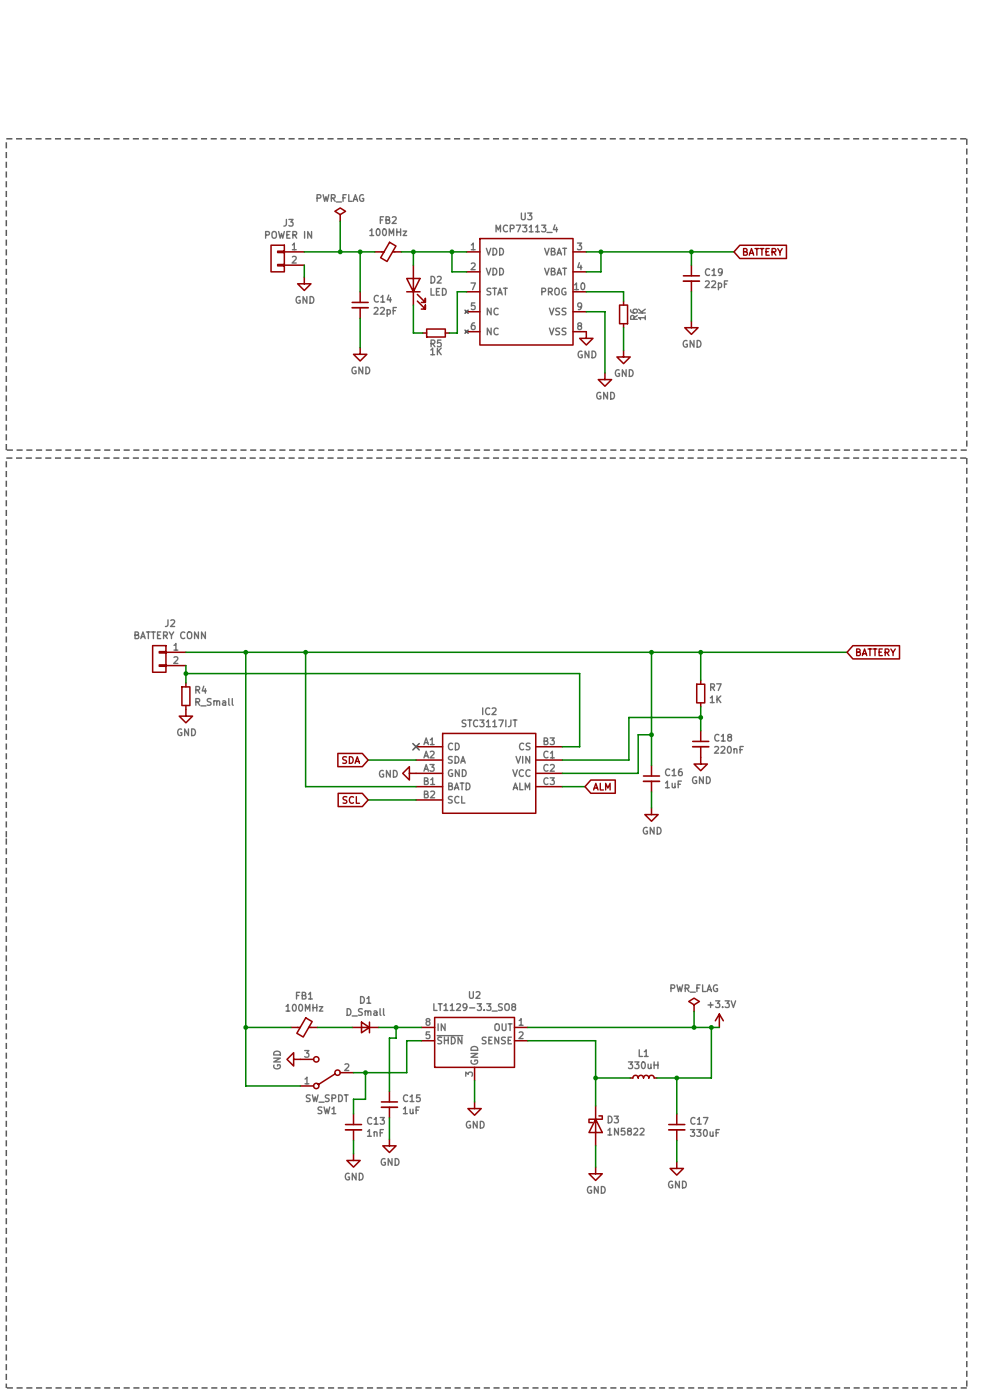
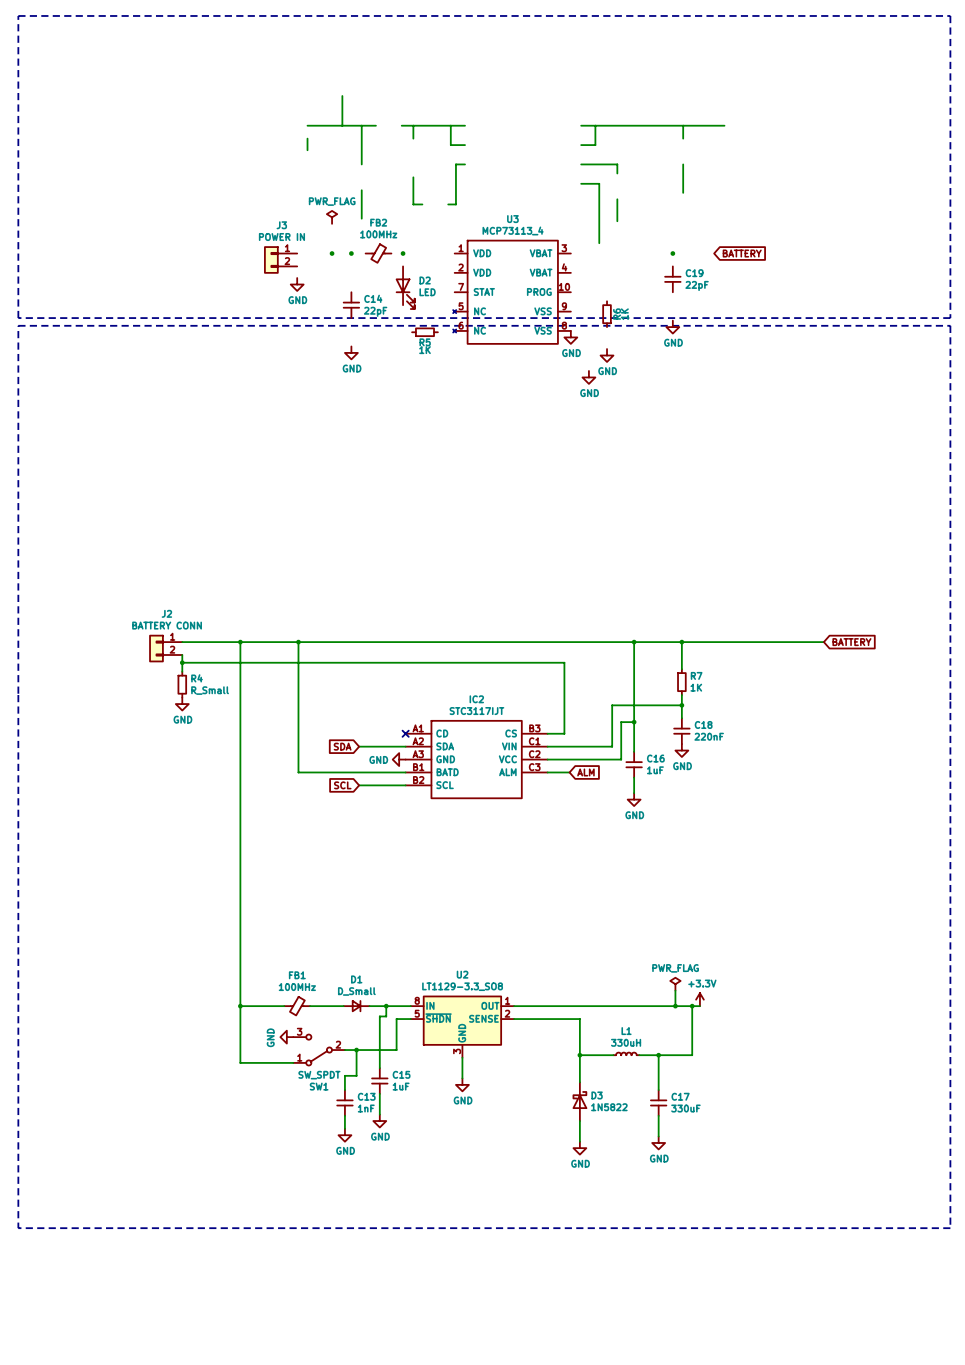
line: none -> (18, 15) (18, 318) (950, 318) (950, 15) (18, 15)
wire: none -> (342, 96) (342, 125)
wire: none -> (307, 125) (375, 125)
wire: none -> (361, 125) (361, 164)
wire: none -> (401, 125) (465, 125)
wire: none -> (413, 125) (413, 138)
wire: none -> (450, 125) (450, 145) (465, 145)
wire: none -> (581, 125) (724, 125)
wire: none -> (595, 125) (595, 145) (581, 145)
wire: none -> (683, 125) (683, 138)
wire: none -> (307, 138) (307, 150)
line: (6, 138) (6, 450) (966, 450) (966, 138) (6, 138) -> none
wire: none -> (465, 164) (455, 164) (455, 204) (448, 204)
wire: none -> (581, 164) (617, 164) (617, 173)
wire: none -> (683, 164) (683, 192)
wire: none -> (413, 177) (413, 204) (422, 204)
wire: none -> (581, 183) (599, 183) (599, 243)
wire: none -> (361, 190) (361, 218)
wire: none -> (617, 199) (617, 221)
wire: (340, 221) (340, 251) -> none
wire: (304, 251) (374, 251) -> none
wire: (360, 251) (360, 291) -> none
wire: (401, 251) (466, 251) -> none
wire: (413, 251) (413, 265) -> none
wire: (451, 251) (451, 271) (466, 271) -> none
junction: (451, 251) -> none
wire: (586, 251) (733, 251) -> none
wire: (600, 251) (600, 271) (586, 271) -> none
junction: (600, 251) -> none
wire: (691, 251) (691, 265) -> none
wire: (304, 265) (304, 277) -> none
wire: (466, 291) (457, 291) (457, 333) (449, 333) -> none
wire: (586, 291) (623, 291) (623, 301) -> none
wire: (691, 291) (691, 321) -> none
wire: (413, 305) (413, 333) (422, 333) -> none
wire: (586, 311) (604, 311) (604, 372) -> none
wire: (360, 318) (360, 347) -> none
wire: (623, 327) (623, 350) -> none
line: none -> (18, 693) (18, 325) (950, 325) (950, 700)
line: none -> (18, 695) (18, 1228) (950, 1228) (950, 701)
line: (6, 837) (6, 458) (966, 458) (966, 843) -> none
line: (6, 838) (6, 1387) (966, 1387) (966, 845) -> none

